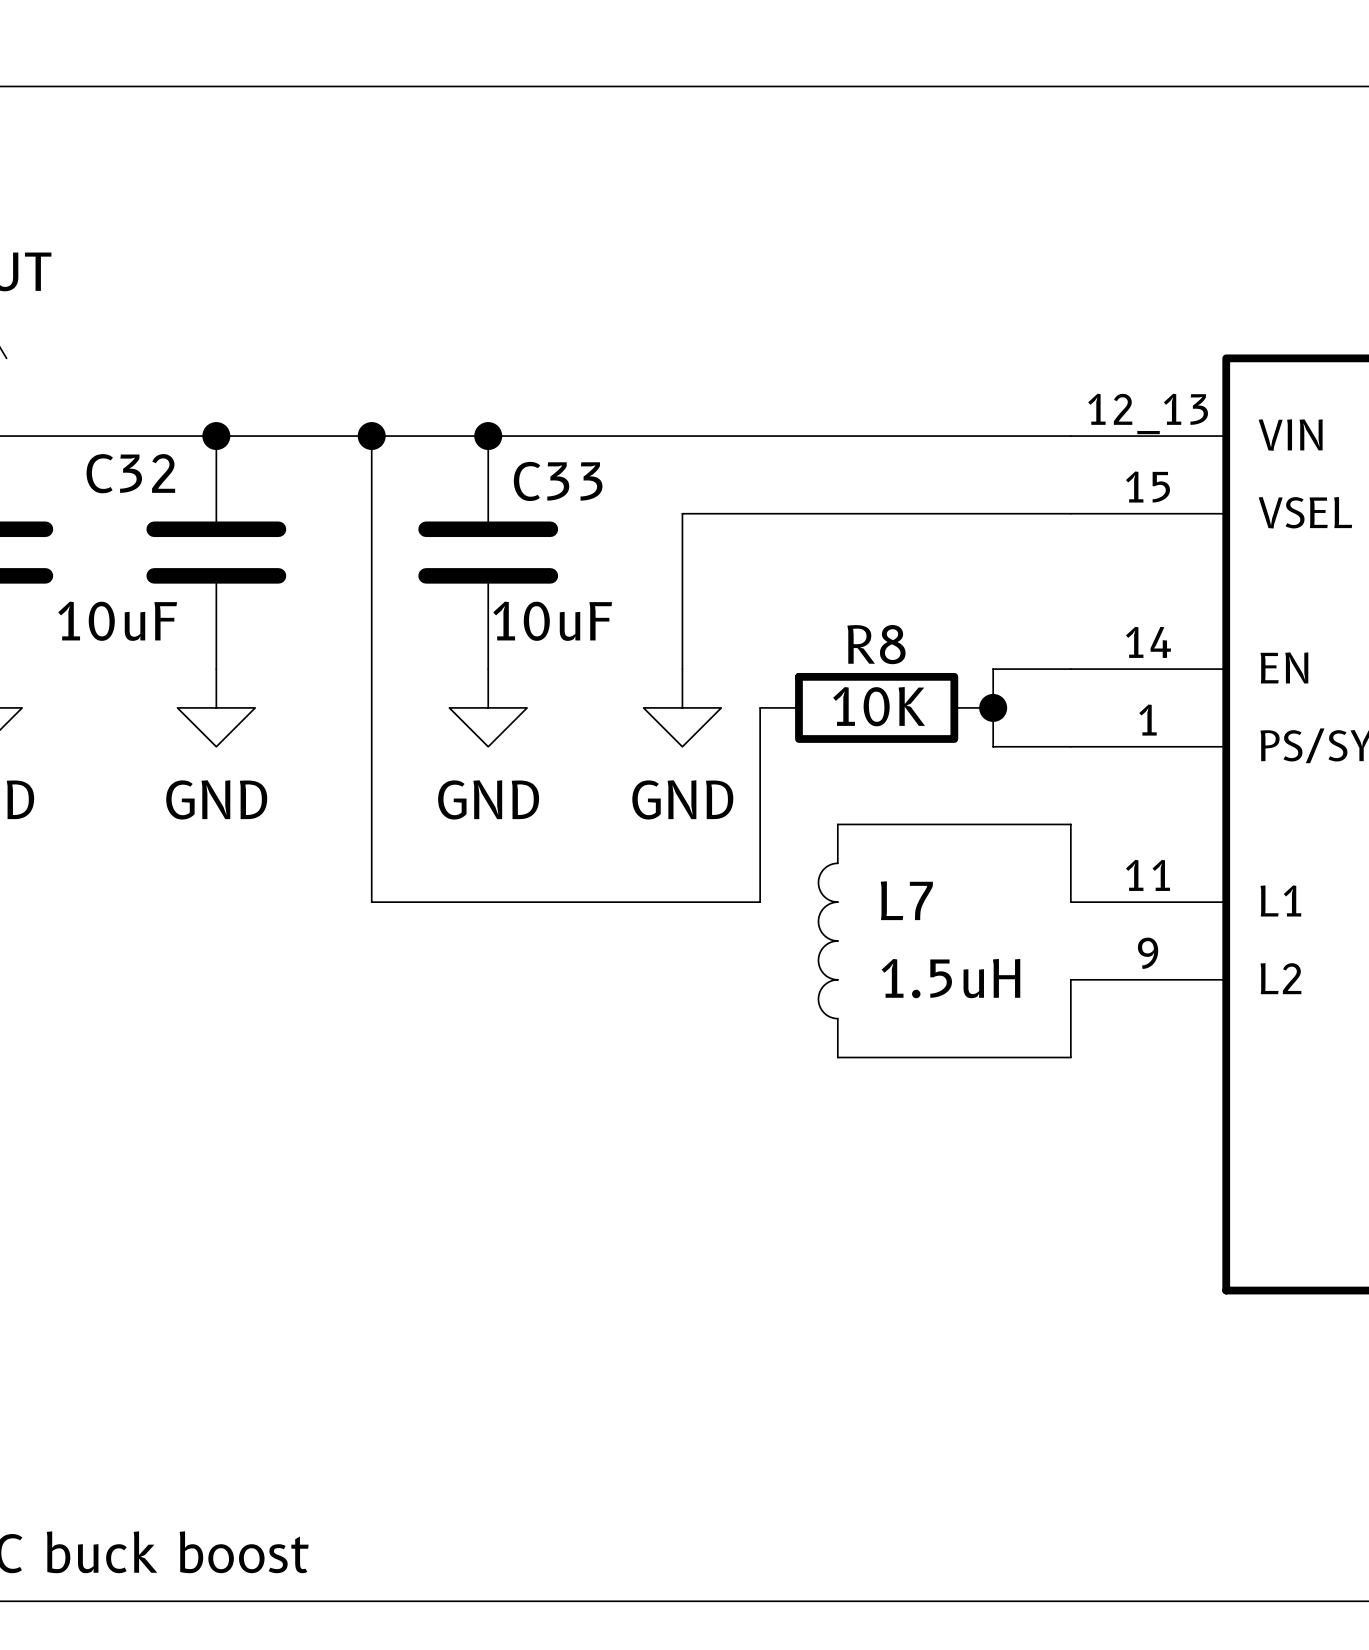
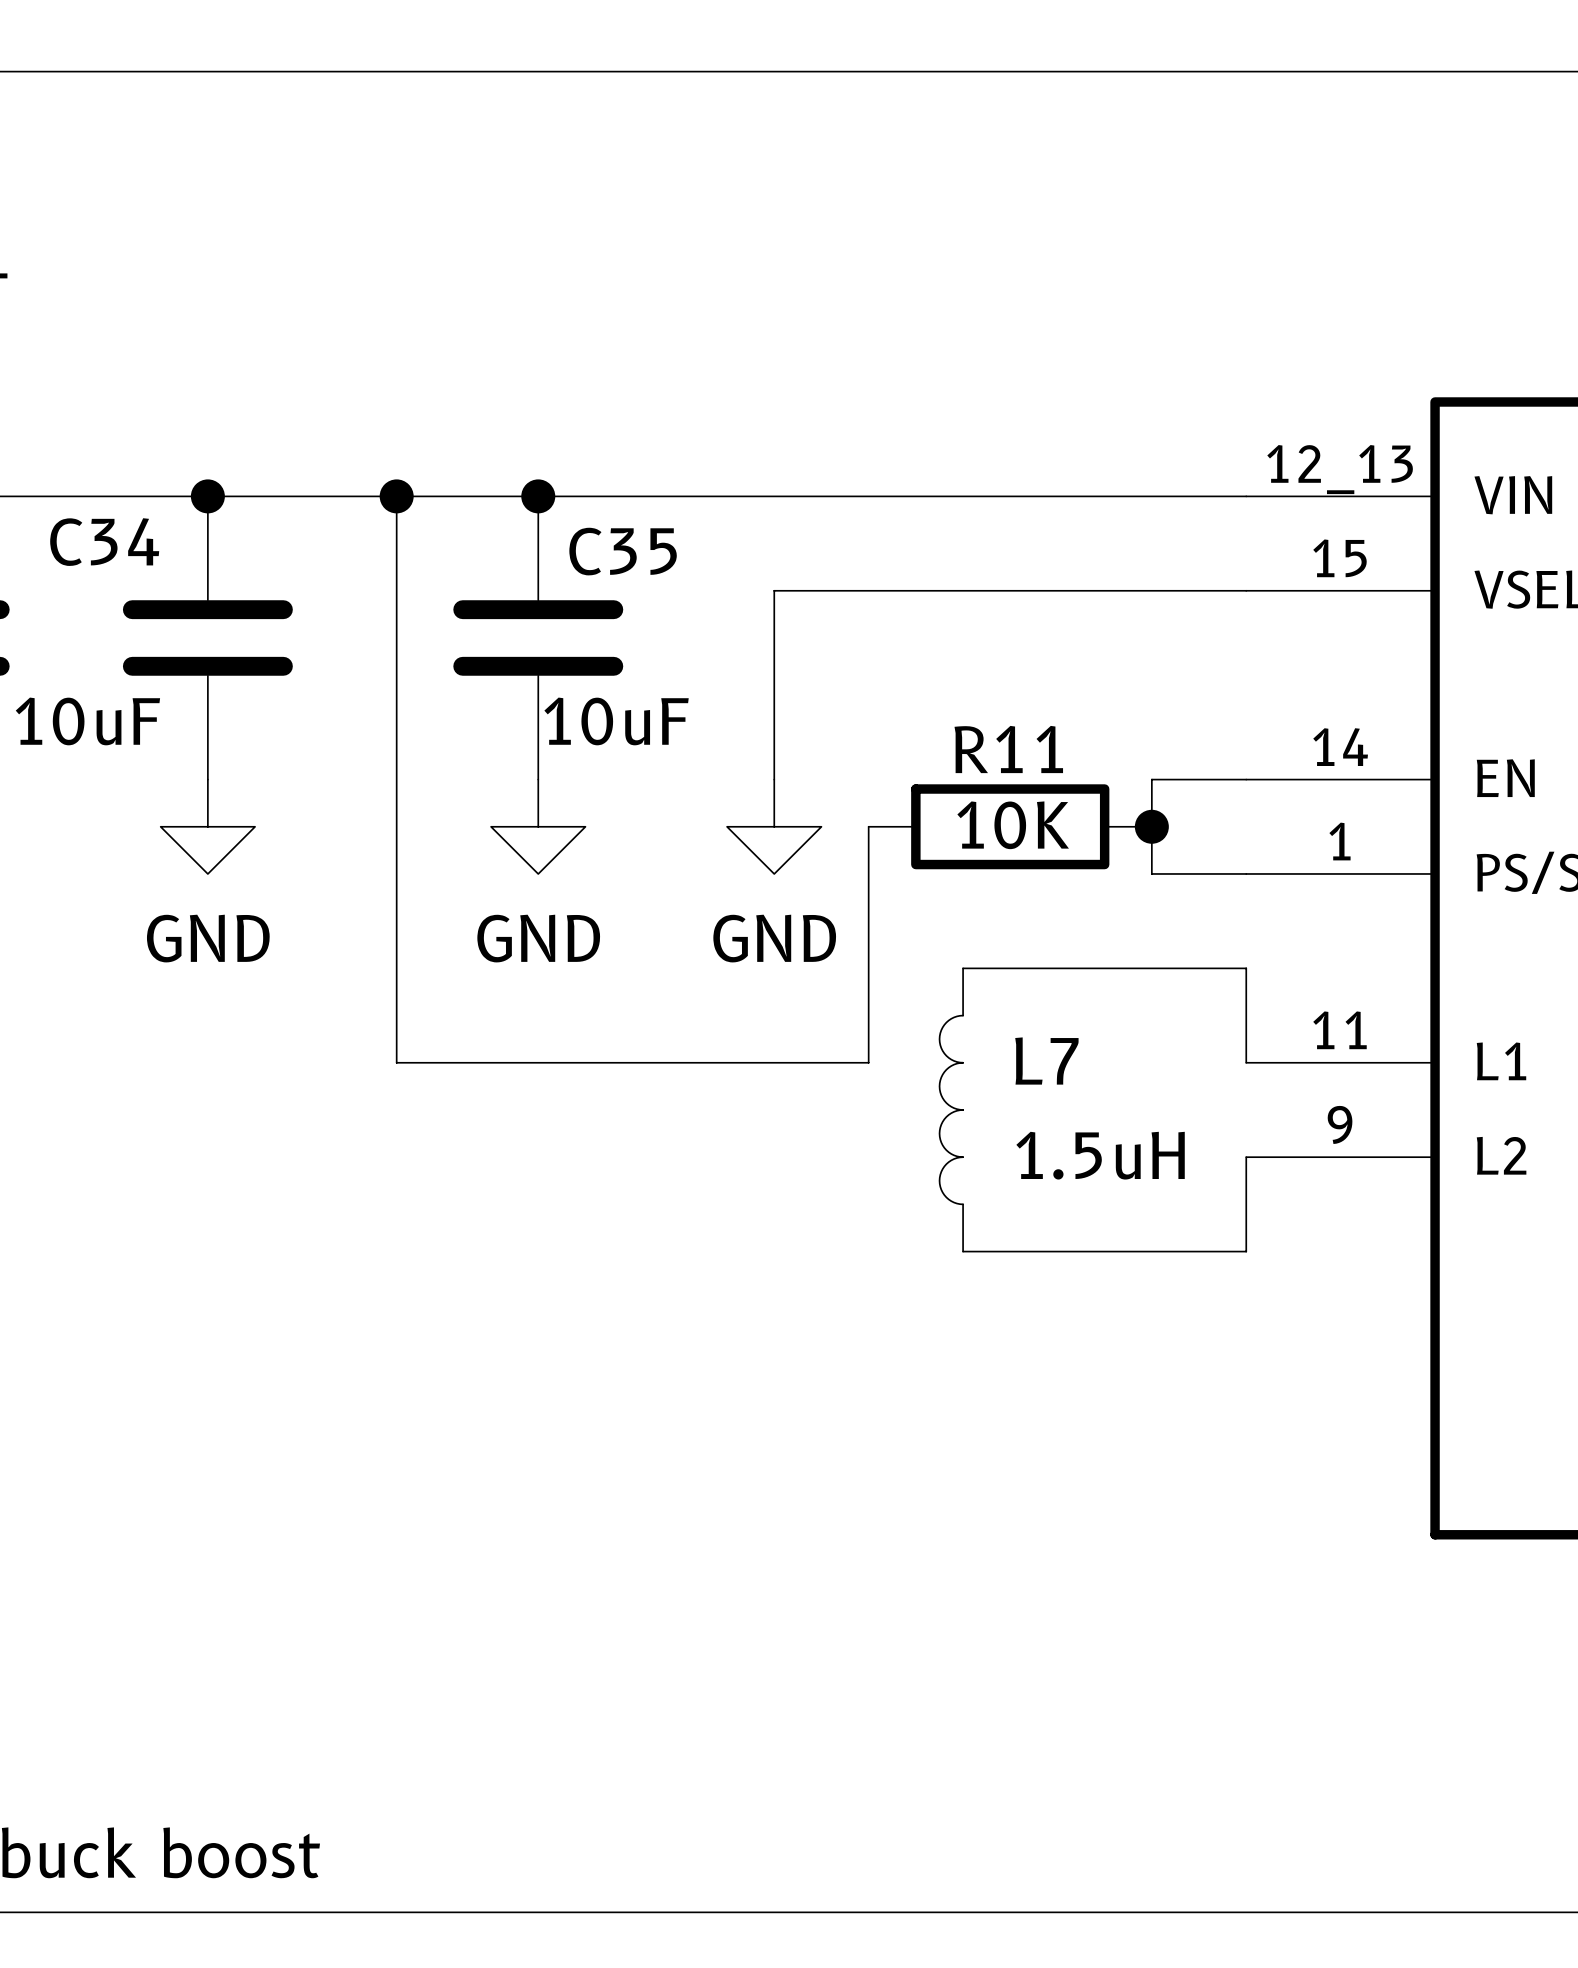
C32 name: C32 (130, 473) -> C34 (104, 542)
C33 name: C33 (558, 481) -> C35 (623, 551)
R8 name: R8 (876, 644) -> R11 (1008, 749)

